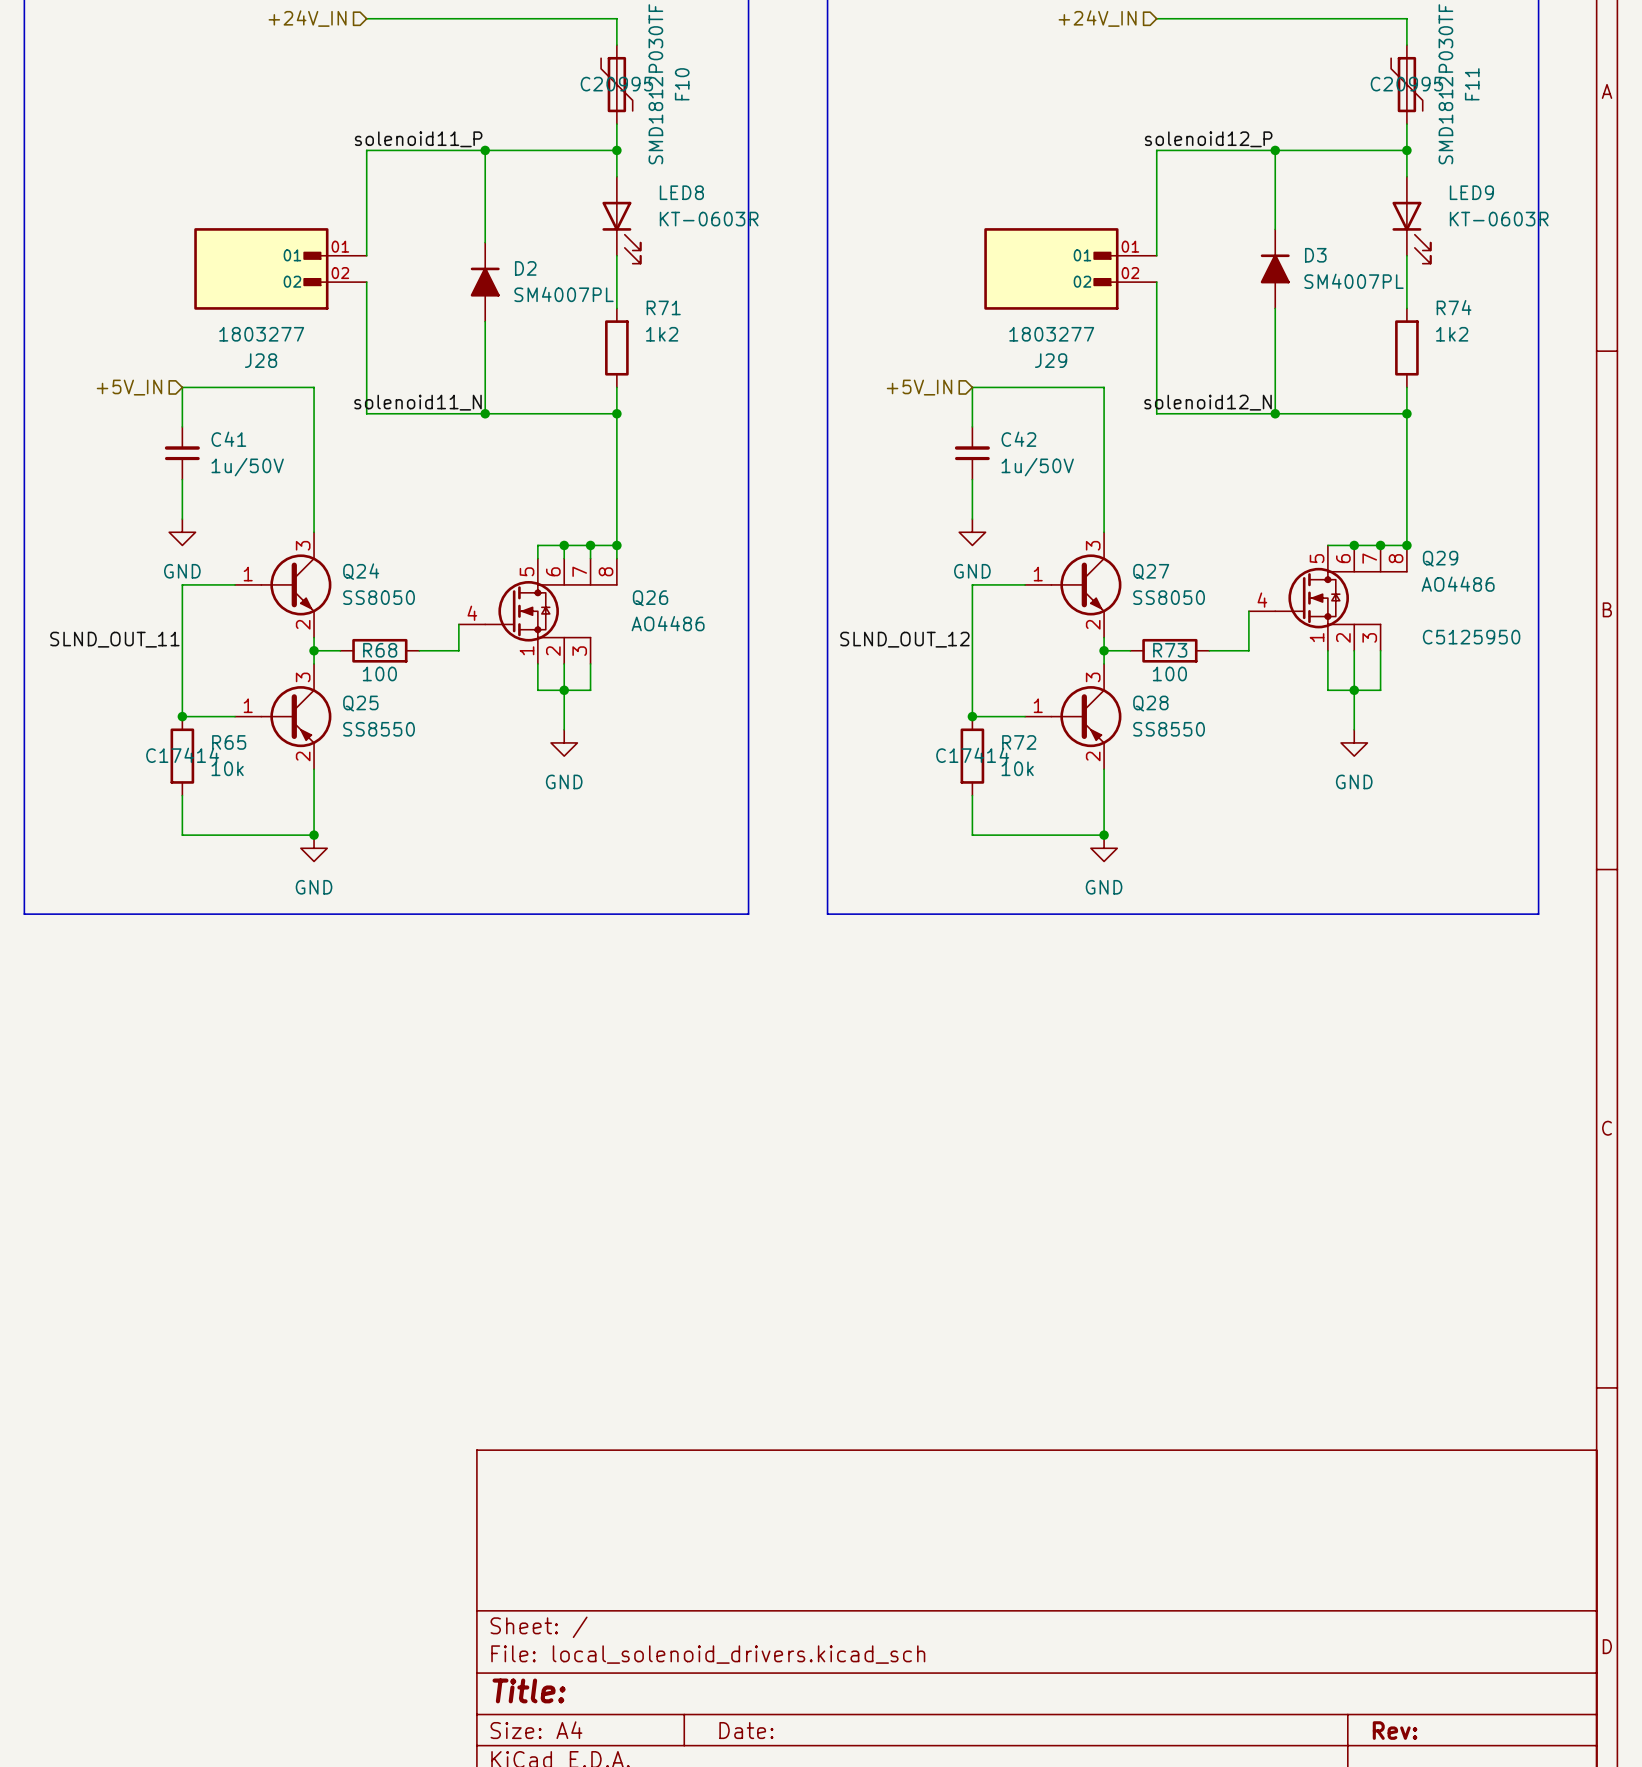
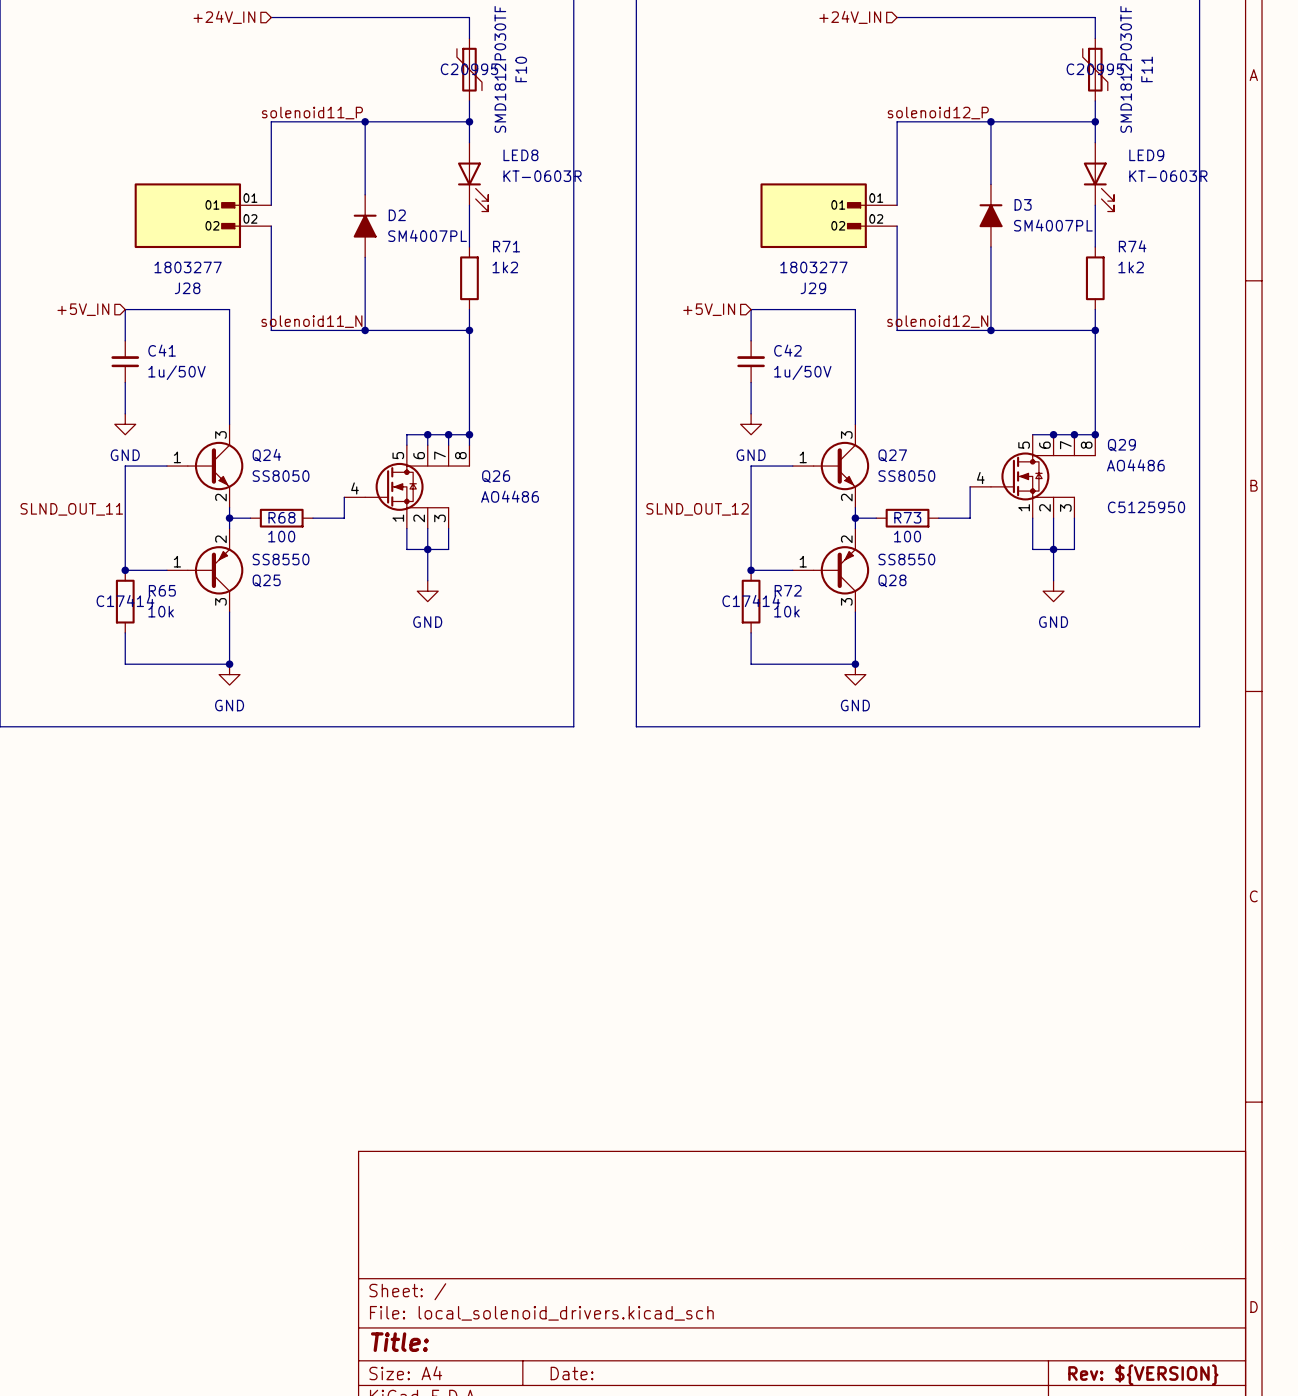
Q25 flip: as is (296, 716) -> up-down (215, 570)
Q28 flip: as is (1086, 716) -> up-down (841, 570)
title block: Rev: (1395, 1730) -> Rev: ${VERSION} (1143, 1374)

